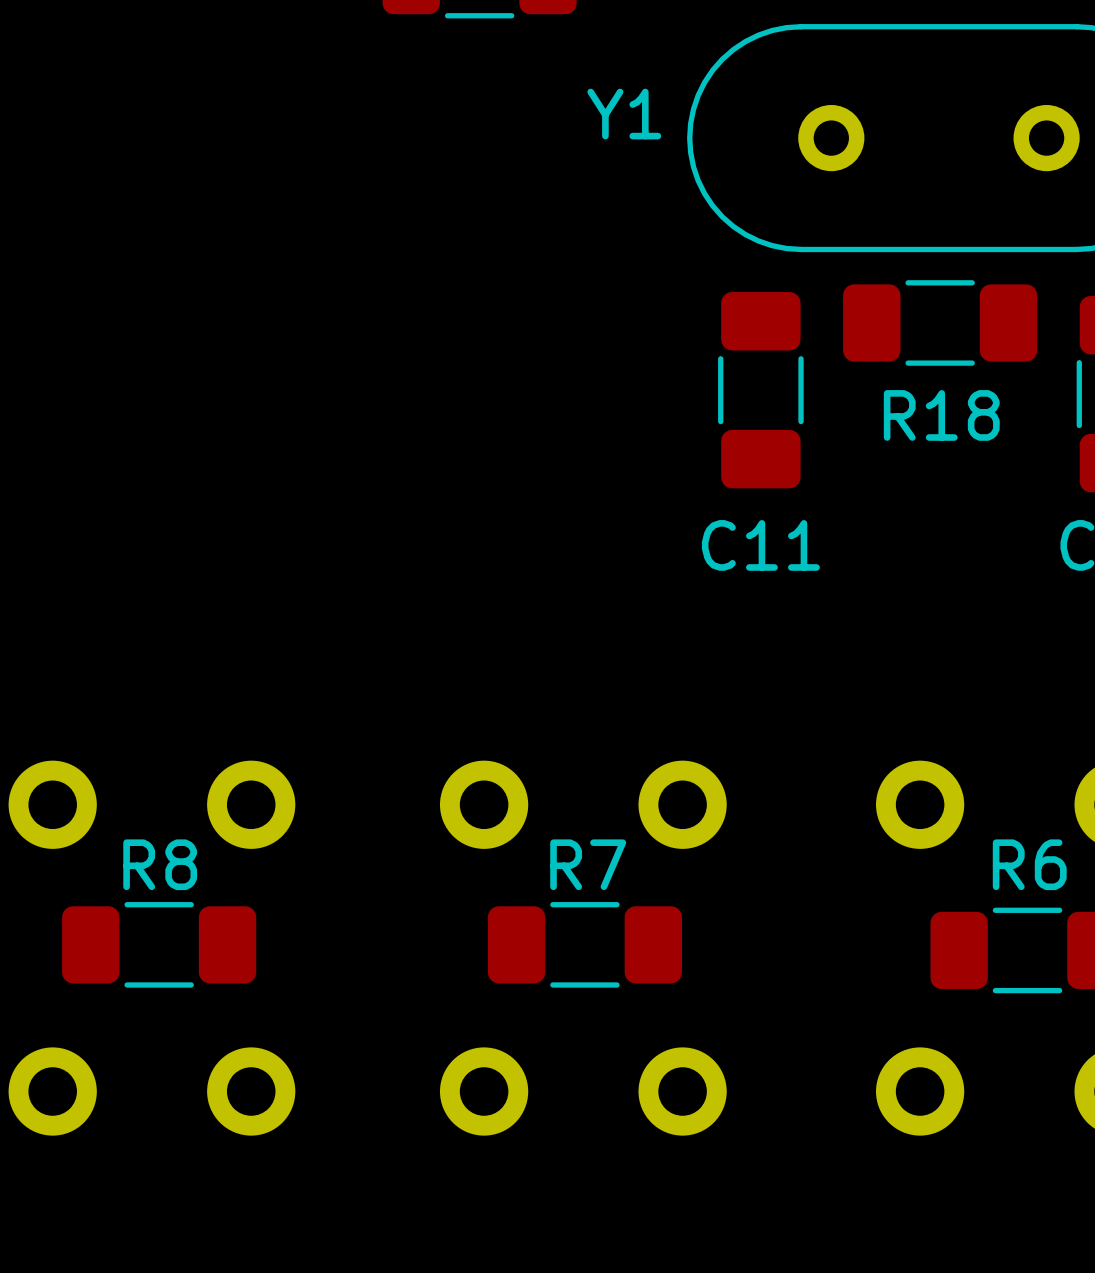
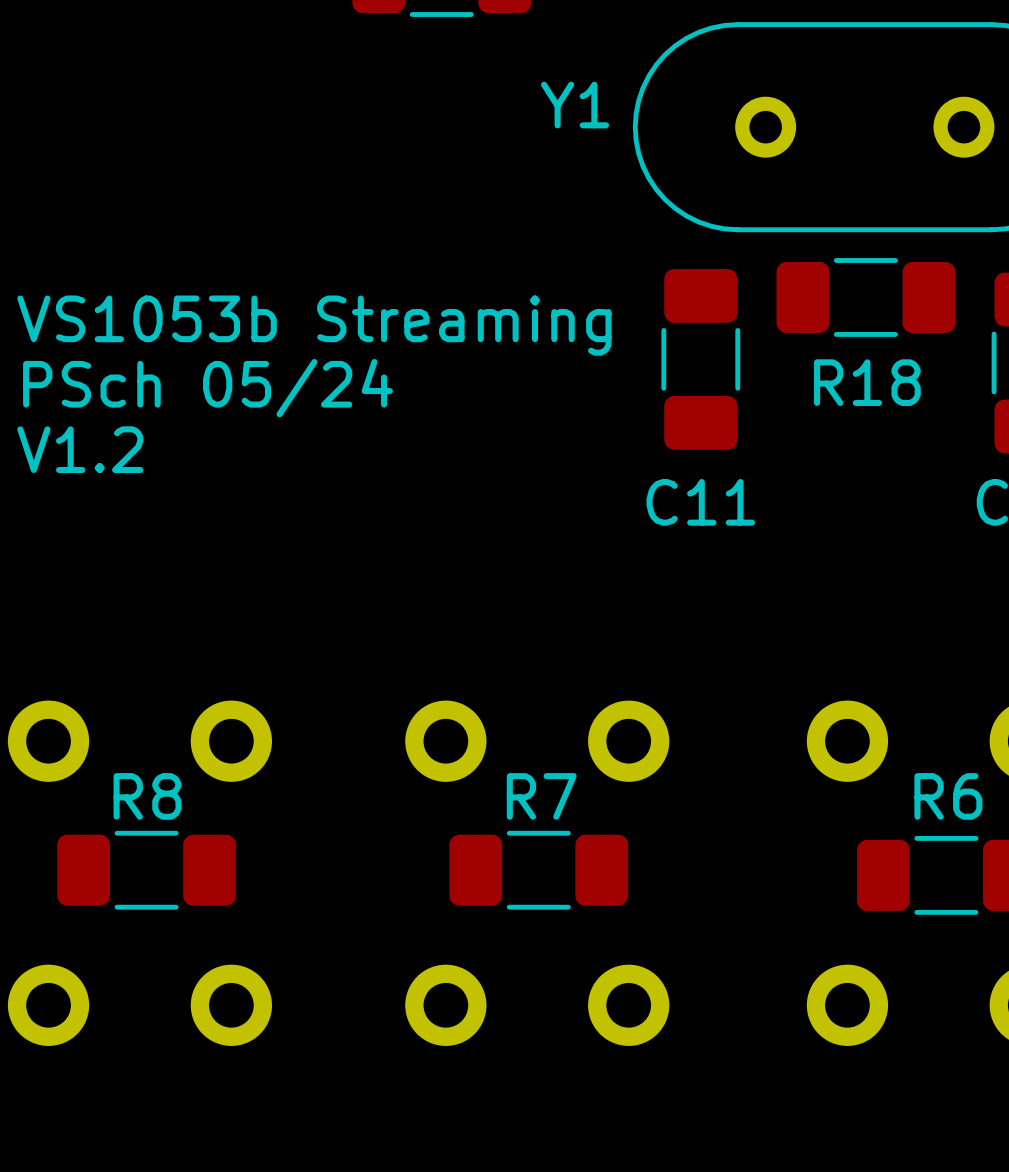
text: none -> VS1053b Streaming (314, 325)
text: none -> PSch 05/24 (207, 388)
text: none -> V1.2 (80, 449)

